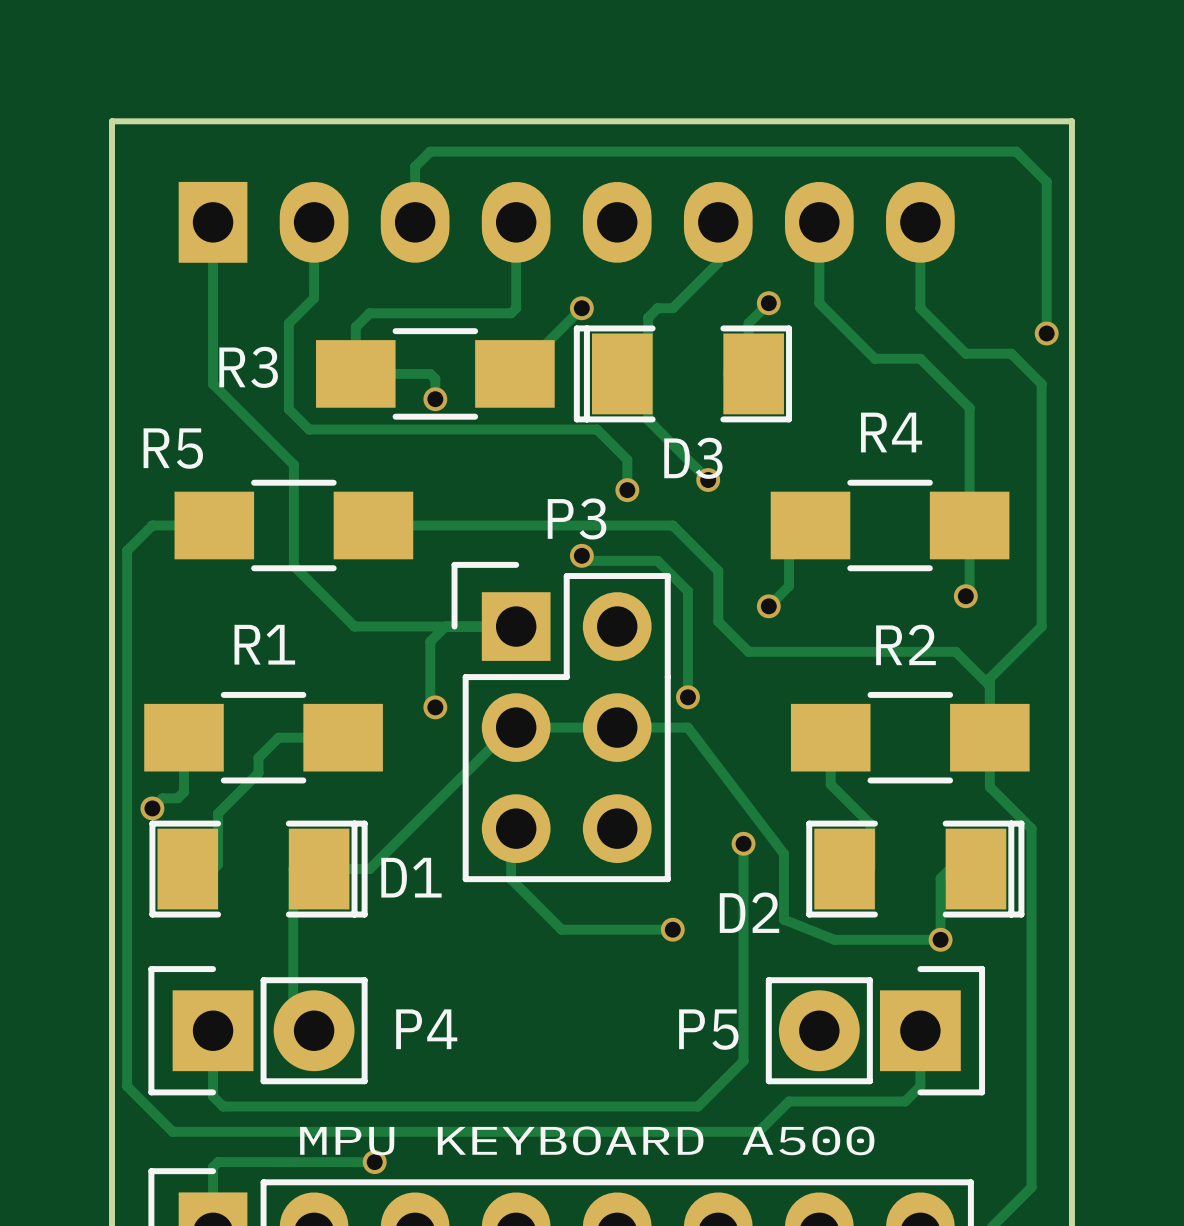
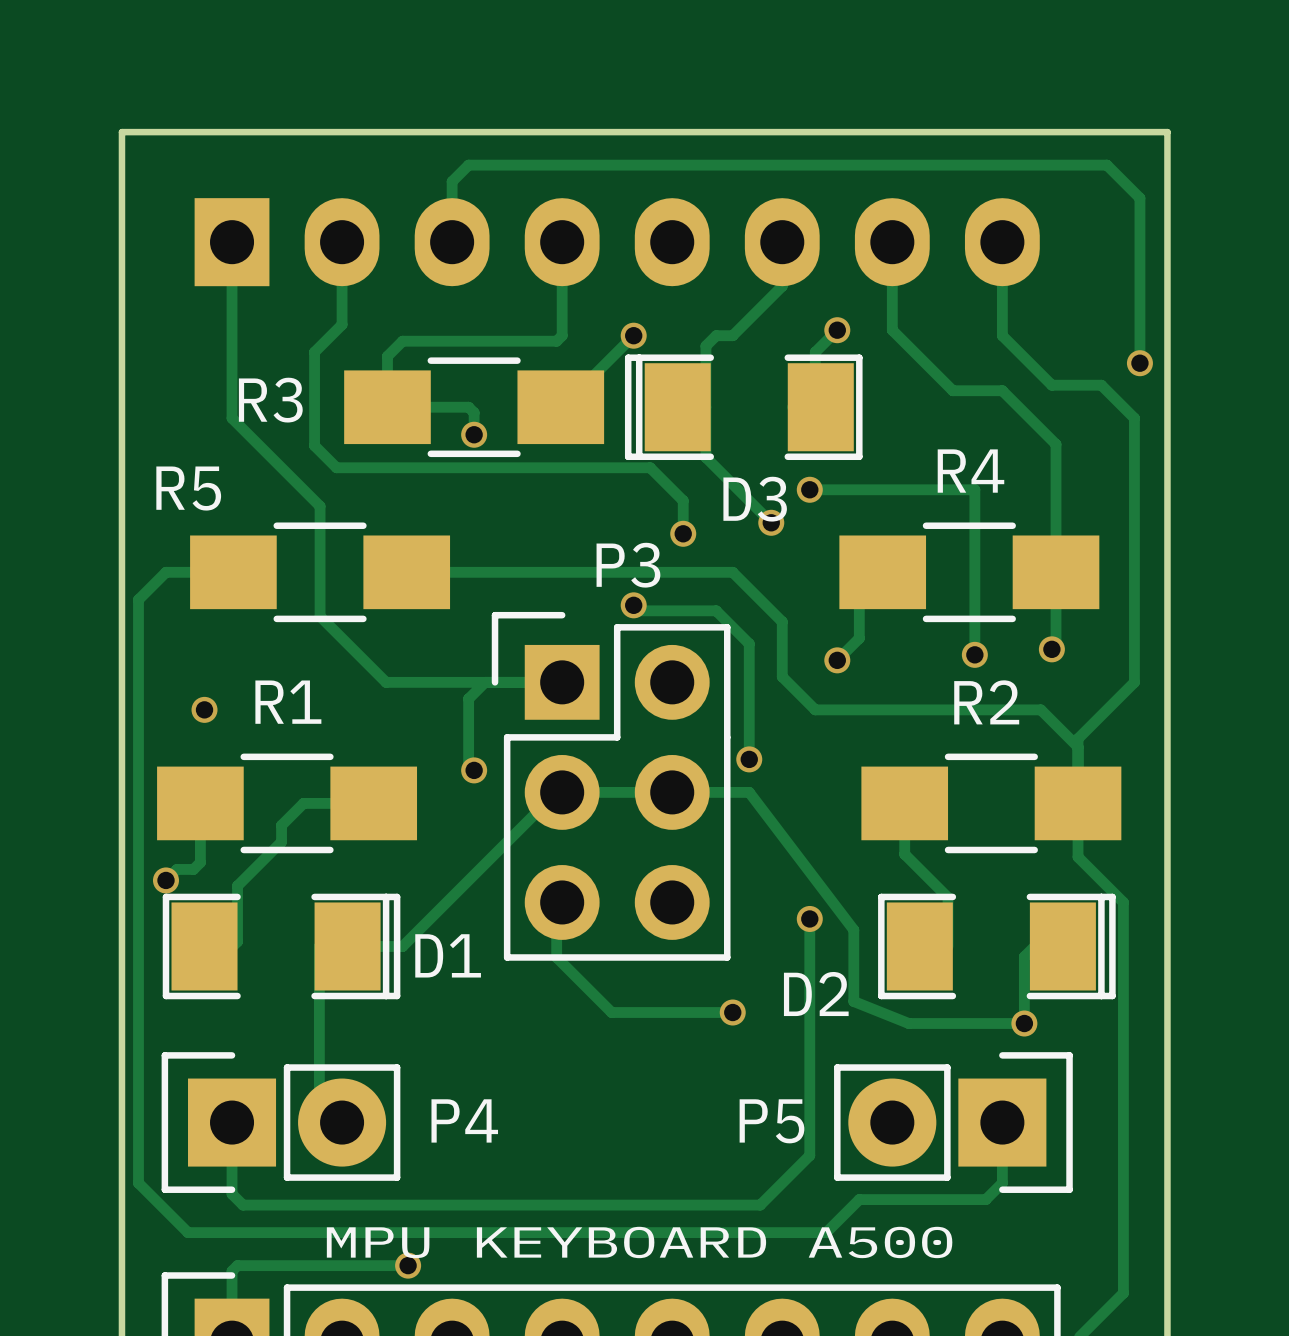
track: none -> (809, 489) (974, 489) (974, 654)
via: none -> (809, 489)
via: none -> (974, 654)
via: none -> (204, 709)

